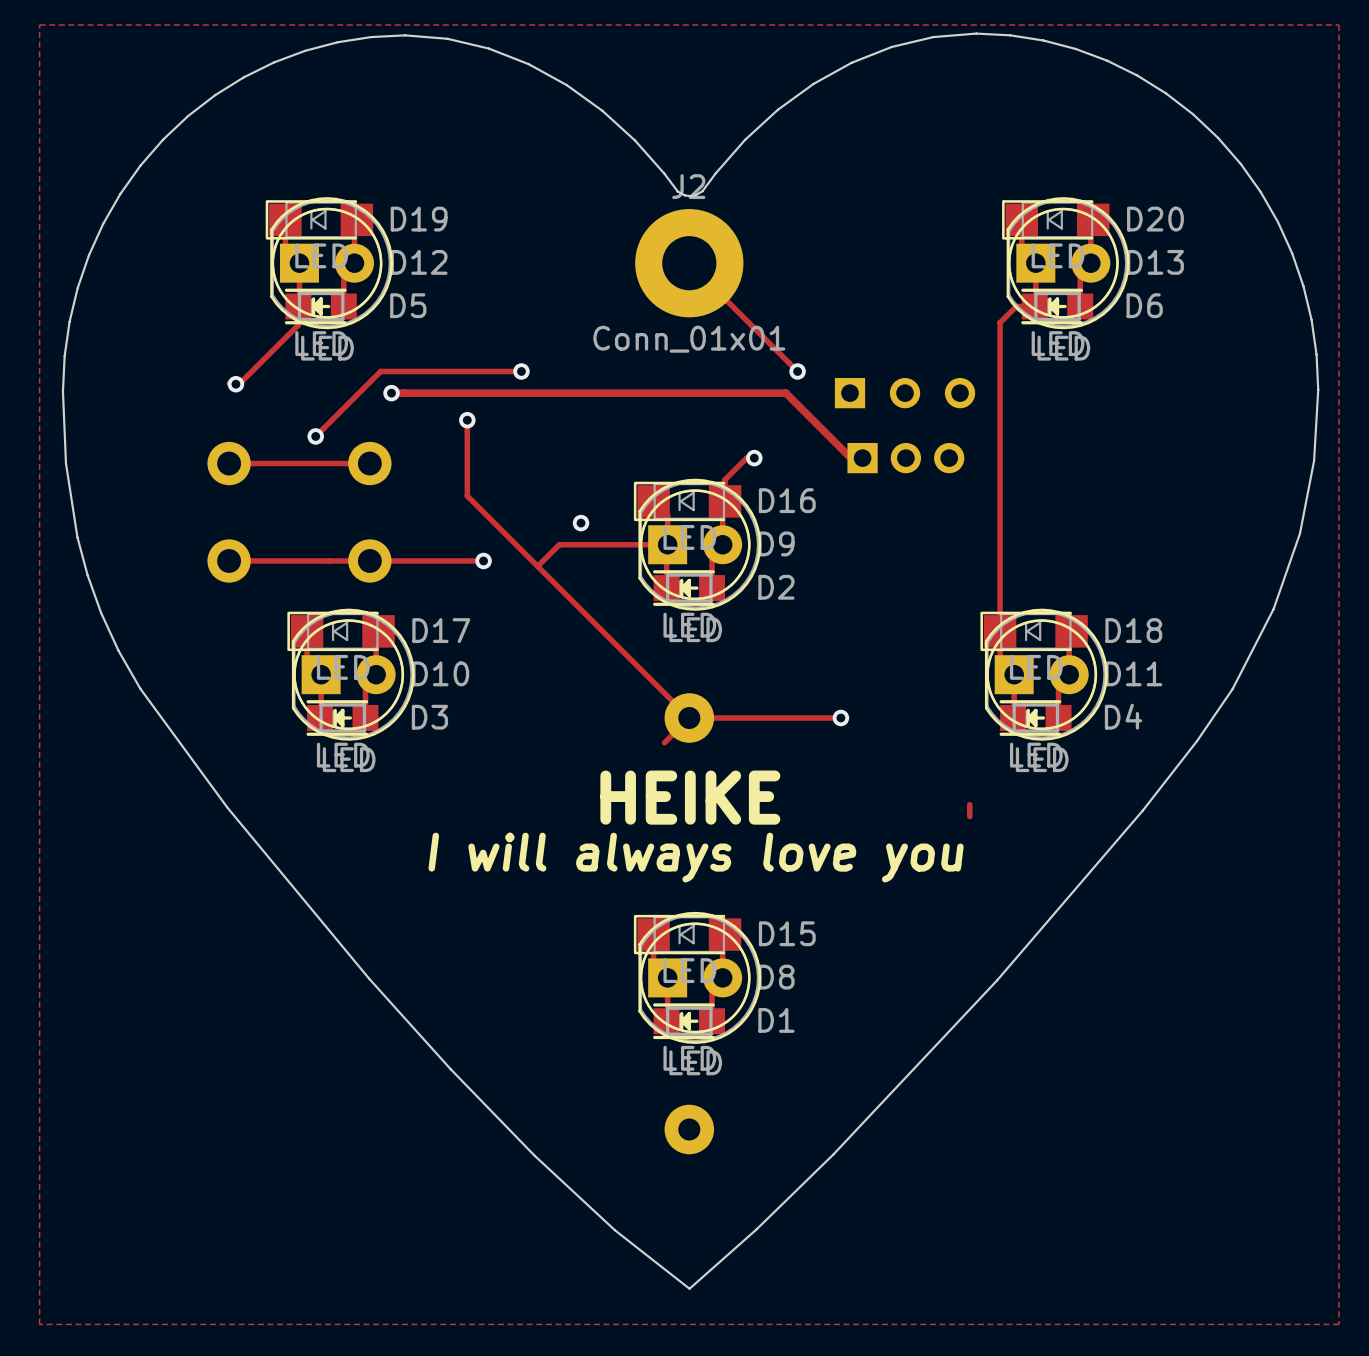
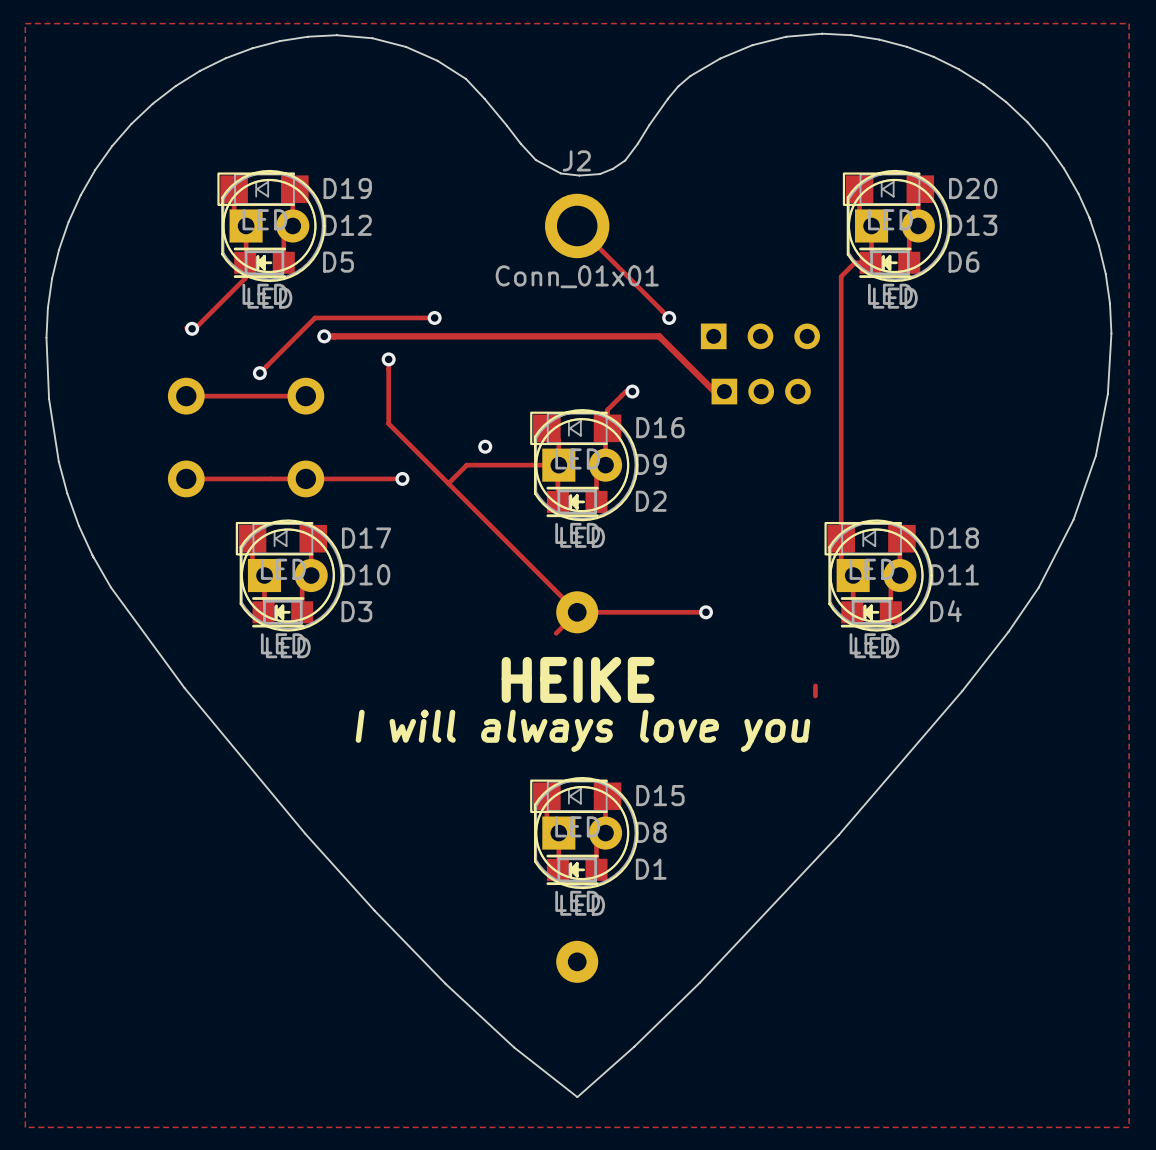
J2 footprint: [635, 209, 744, 318] -> [545, 193, 610, 259]
board edge: (1279, 225) (1260, 192) (1240, 164) (1218, 137) (1193, 114) (1166, 93) (1137, 75) (1107, 60) (1075, 48) (1043, 40) (1010, 35) (976, 33) (933, 37) (891, 46) (851, 62) (813, 83) (777, 109) (745, 139) (702, 191) (690, 196) (677, 191) (635, 140) (602, 110) (566, 85) (528, 64) (488, 48) (447, 38) (404, 35) (371, 37) (337, 42) (305, 50) (274, 62) (243, 77) (215, 95) (188, 116) (163, 139) (140, 165) (120, 193) (103, 223) (88, 255) (77, 287) (69, 321) (64, 356) (62, 391) (65, 463) (77, 537) (87, 575) (102, 616) -> (1078, 193) (1046, 144) (1006, 102) (959, 69) (906, 46) (879, 39) (822, 33) (786, 36) (752, 45) (720, 58) (690, 76) (678, 86) (625, 160) (600, 174) (579, 175) (560, 173) (535, 160) (466, 79) (437, 60) (406, 46) (372, 38) (336, 35) (308, 36) (252, 48) (200, 70) (175, 86) (131, 123) (95, 169) (68, 221) (52, 278) (46, 337) (49, 398) (58, 461) (78, 525)
J2 value position: Conn_01x01 (689, 339) -> Conn_01x01 (577, 276)

